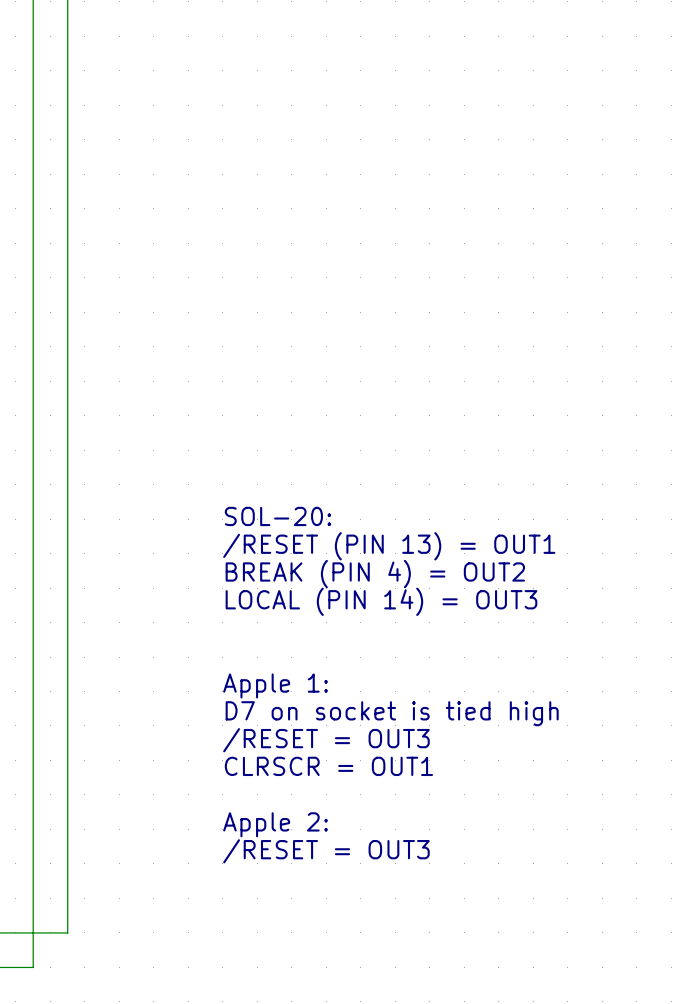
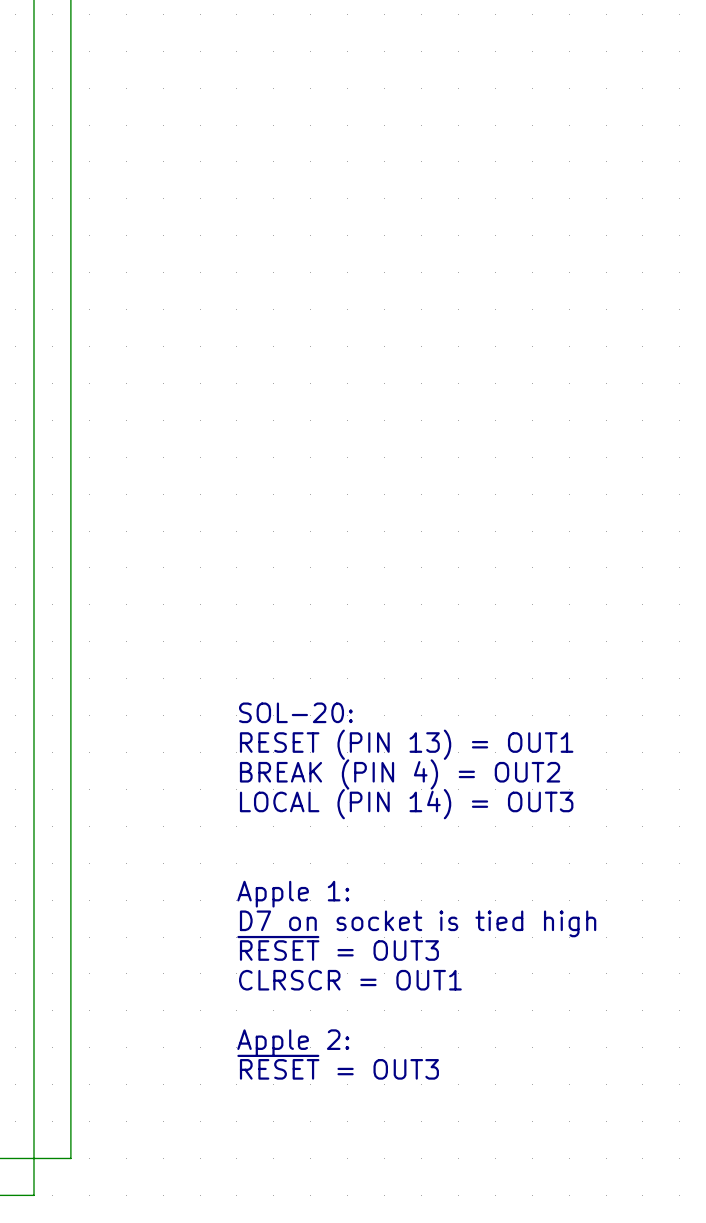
text: /RESET (PIN 13) = OUT1 (389, 546) -> RESET (PIN 13) = OUT1 (406, 744)
text: /RESET = OUT3 (326, 740) -> ~{RESET} = OUT3 (338, 948)
text: /RESET = OUT3 (326, 851) -> ~{RESET} = OUT3 (338, 1067)

